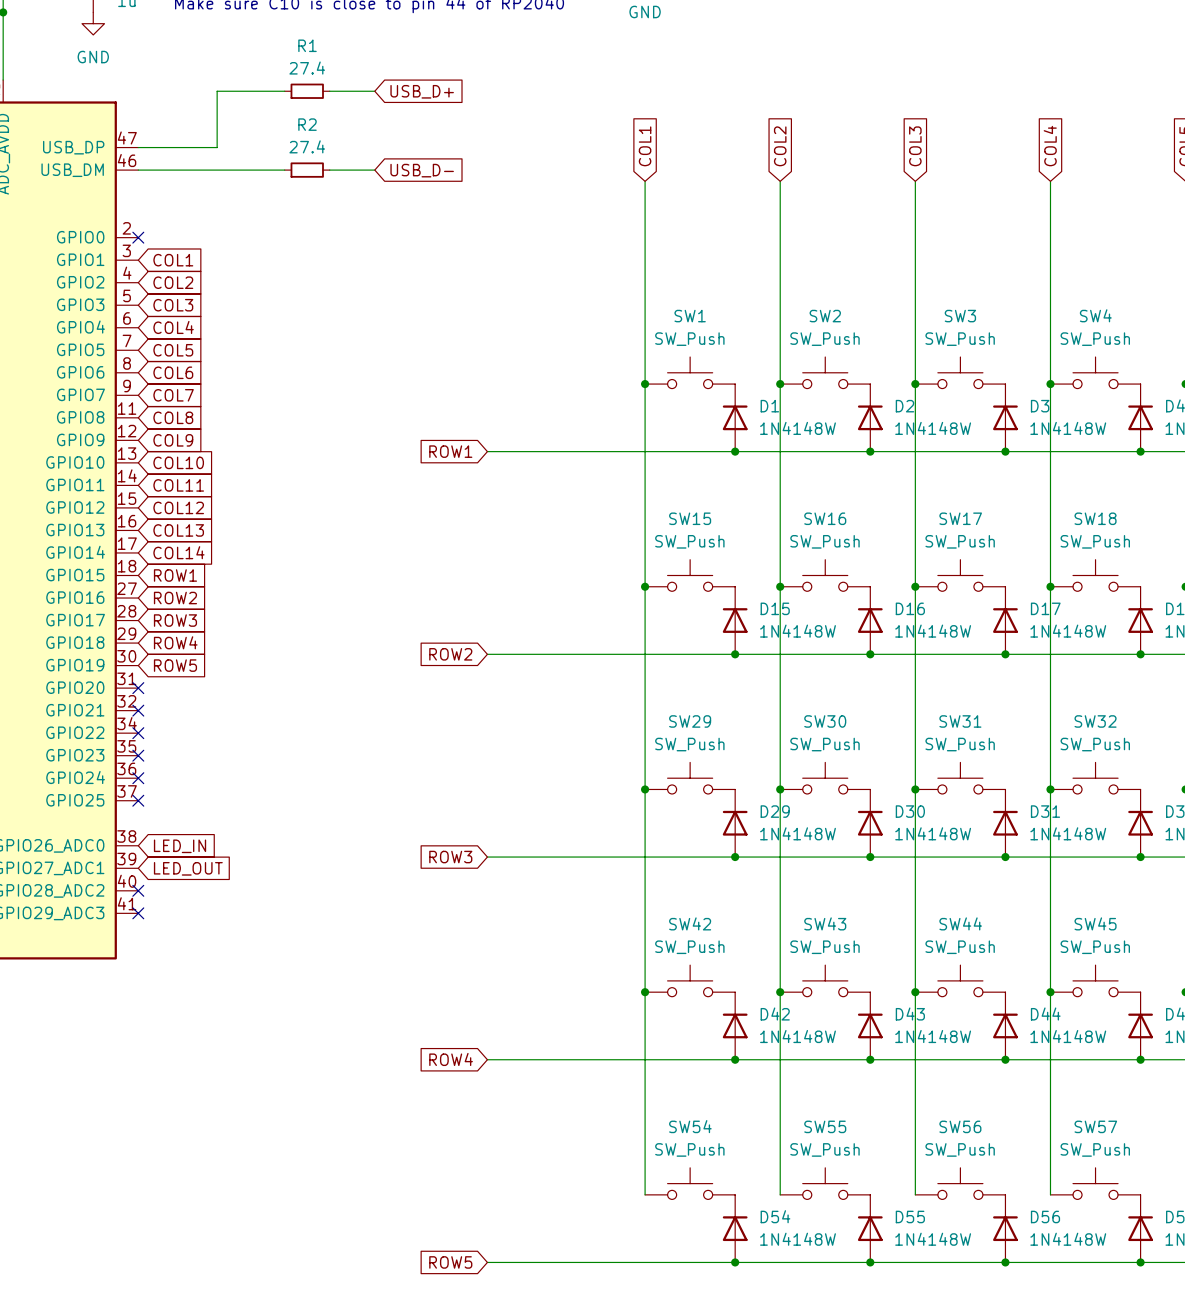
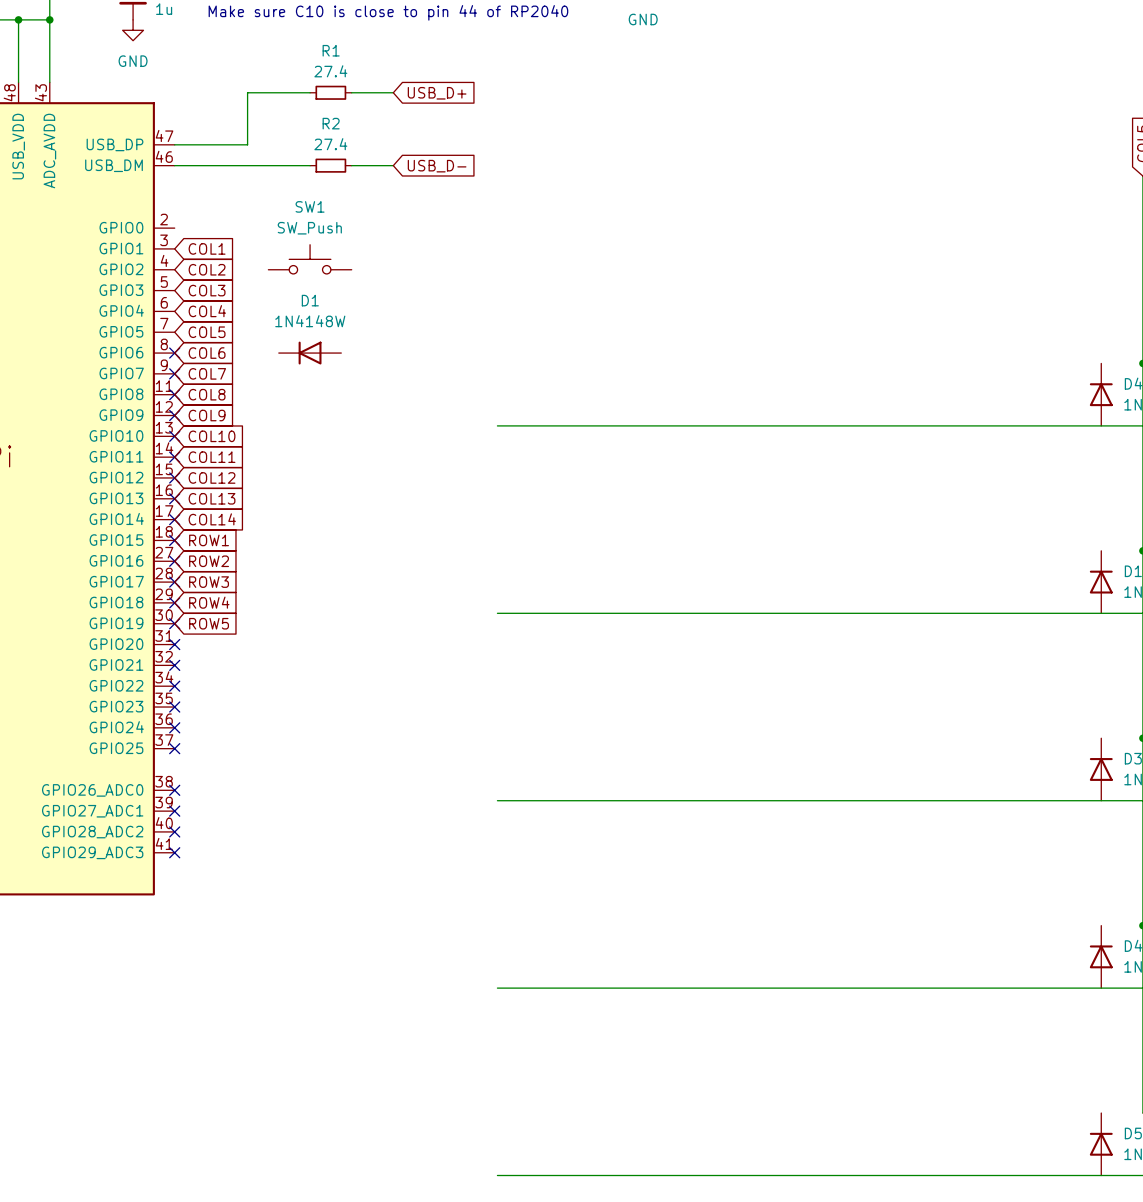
global label: COL1 (645, 146) -> none
global label: COL2 (780, 146) -> none
global label: COL3 (915, 146) -> none
global label: COL4 (1050, 146) -> none
wire: (645, 181) (645, 1194) -> none
wire: (780, 181) (780, 1194) -> none
wire: (915, 181) (915, 1194) -> none
wire: (1050, 181) (1050, 1194) -> none
no-connect mark: (138, 237) -> none
SW1: none -> SW_Push (310, 259)
no-connect mark: none -> (174, 353)
SW1: SW_Push (690, 372) -> none
SW2: SW_Push (825, 372) -> none
SW3: SW_Push (960, 372) -> none
SW4: SW_Push (1095, 372) -> none
junction: (645, 384) -> none
junction: (780, 384) -> none
junction: (915, 384) -> none
junction: (1050, 384) -> none
no-connect mark: none -> (174, 373)
D1 name position: D1 (769, 406) -> D1 (310, 300)
no-connect mark: none -> (174, 394)
D1 rotation: 0° (735, 417) -> 90° counterclockwise (310, 353)
D1 position: (735, 417) -> (310, 353)
D2: 1N4148W (870, 417) -> none
D3: 1N4148W (1005, 417) -> none
D1 value position: 1N4148W (797, 428) -> 1N4148W (310, 321)
no-connect mark: none -> (174, 415)
global label: ROW1 (450, 451) -> none
junction: (735, 451) -> none
junction: (870, 451) -> none
junction: (1005, 451) -> none
junction: (1140, 451) -> none
no-connect mark: none -> (174, 436)
no-connect mark: none -> (174, 457)
no-connect mark: none -> (174, 477)
no-connect mark: none -> (174, 498)
no-connect mark: none -> (174, 519)
no-connect mark: none -> (174, 540)
SW15: SW_Push (690, 575) -> none
SW16: SW_Push (825, 575) -> none
SW17: SW_Push (960, 575) -> none
SW18: SW_Push (1095, 575) -> none
junction: (645, 586) -> none
junction: (780, 586) -> none
junction: (915, 586) -> none
junction: (1050, 586) -> none
no-connect mark: none -> (174, 561)
no-connect mark: none -> (174, 582)
D15: 1N4148W (735, 620) -> none
D16: 1N4148W (870, 620) -> none
D17: 1N4148W (1005, 620) -> none
no-connect mark: none -> (174, 602)
global label: ROW2 (450, 654) -> none
junction: (735, 654) -> none
junction: (870, 654) -> none
junction: (1005, 654) -> none
junction: (1140, 654) -> none
no-connect mark: none -> (174, 623)
SW29: SW_Push (690, 778) -> none
SW30: SW_Push (825, 778) -> none
SW31: SW_Push (960, 778) -> none
SW32: SW_Push (1095, 778) -> none
junction: (645, 789) -> none
junction: (780, 789) -> none
junction: (915, 789) -> none
junction: (1050, 789) -> none
D29: 1N4148W (735, 823) -> none
D30: 1N4148W (870, 823) -> none
D31: 1N4148W (1005, 823) -> none
no-connect mark: none -> (174, 790)
global label: LED_IN (180, 846) -> none
global label: ROW3 (450, 857) -> none
junction: (735, 857) -> none
junction: (870, 857) -> none
junction: (1005, 857) -> none
junction: (1140, 857) -> none
no-connect mark: none -> (174, 811)
global label: LED_OUT (188, 868) -> none
SW42: SW_Push (690, 980) -> none
SW43: SW_Push (825, 980) -> none
SW44: SW_Push (960, 980) -> none
SW45: SW_Push (1095, 980) -> none
junction: (645, 992) -> none
junction: (780, 992) -> none
junction: (915, 992) -> none
junction: (1050, 992) -> none
D42: 1N4148W (735, 1025) -> none
D43: 1N4148W (870, 1025) -> none
D44: 1N4148W (1005, 1025) -> none
global label: ROW4 (451, 1059) -> none
junction: (735, 1059) -> none
junction: (870, 1059) -> none
junction: (1005, 1059) -> none
junction: (1140, 1059) -> none
SW54: SW_Push (690, 1183) -> none
SW55: SW_Push (825, 1183) -> none
SW56: SW_Push (960, 1183) -> none
SW57: SW_Push (1095, 1183) -> none
D54: 1N4148W (735, 1228) -> none
D55: 1N4148W (870, 1228) -> none
D56: 1N4148W (1005, 1228) -> none
global label: ROW5 (450, 1262) -> none
junction: (735, 1262) -> none
junction: (870, 1262) -> none
junction: (1005, 1262) -> none
junction: (1140, 1262) -> none

